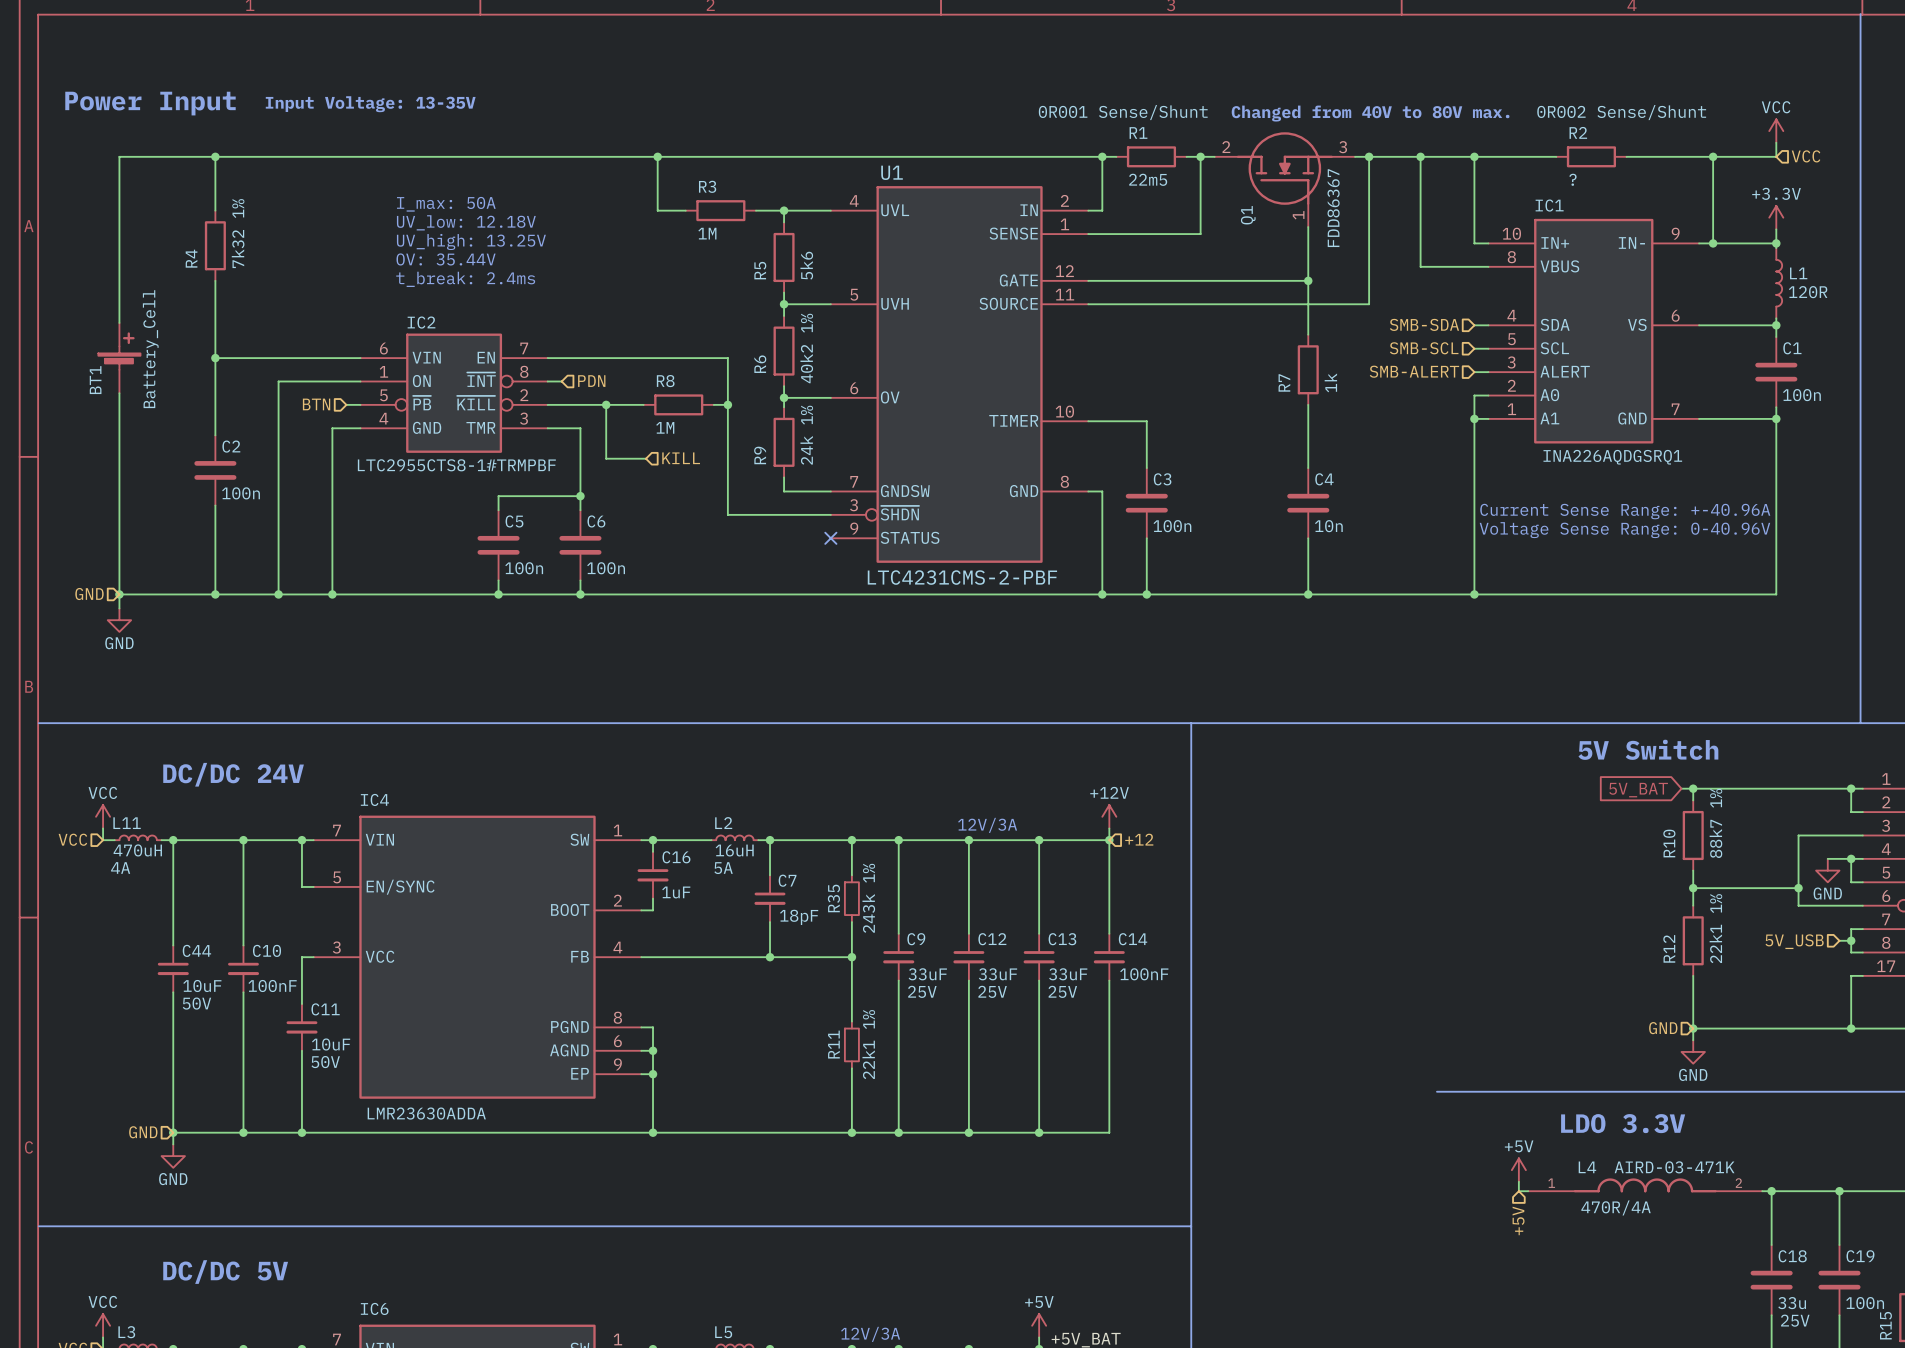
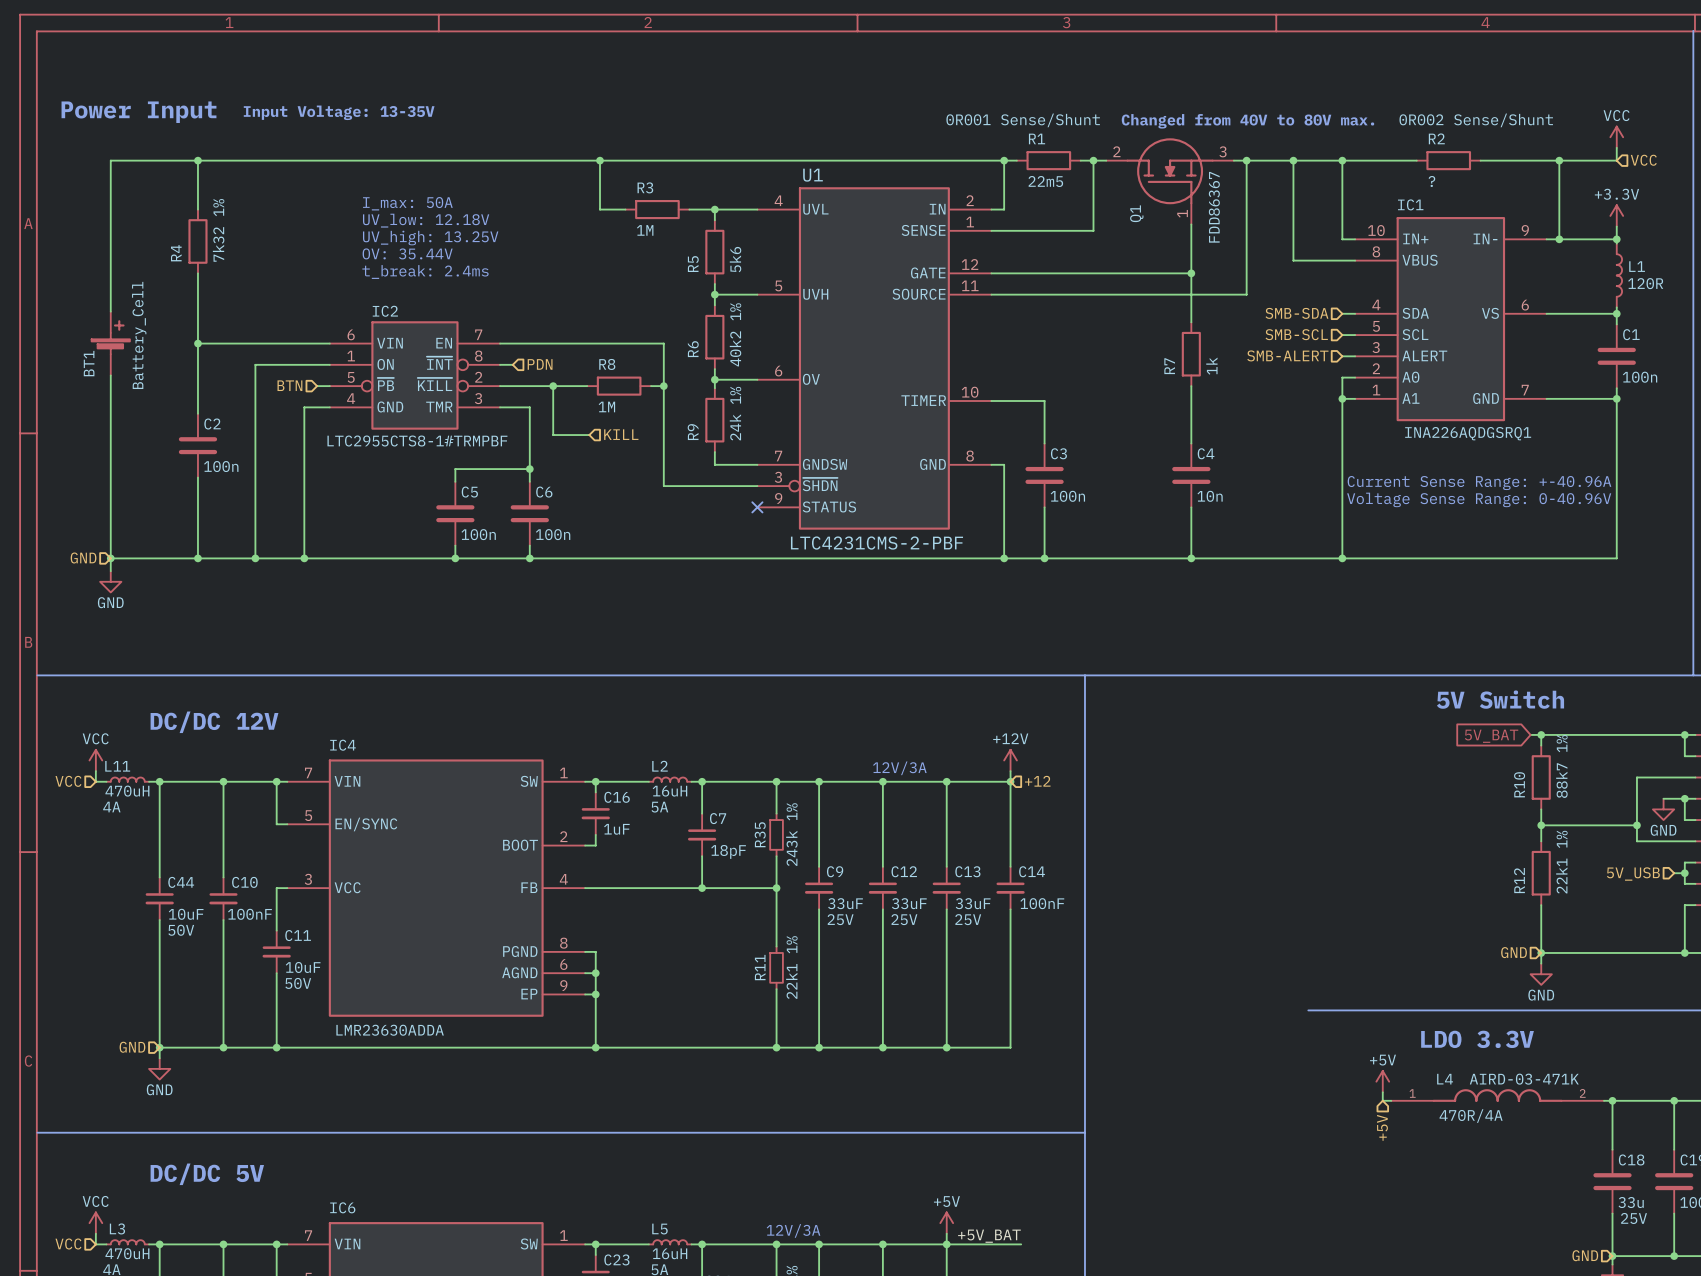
text: DC/DC 24V (233, 774) -> DC/DC 12V (214, 722)

